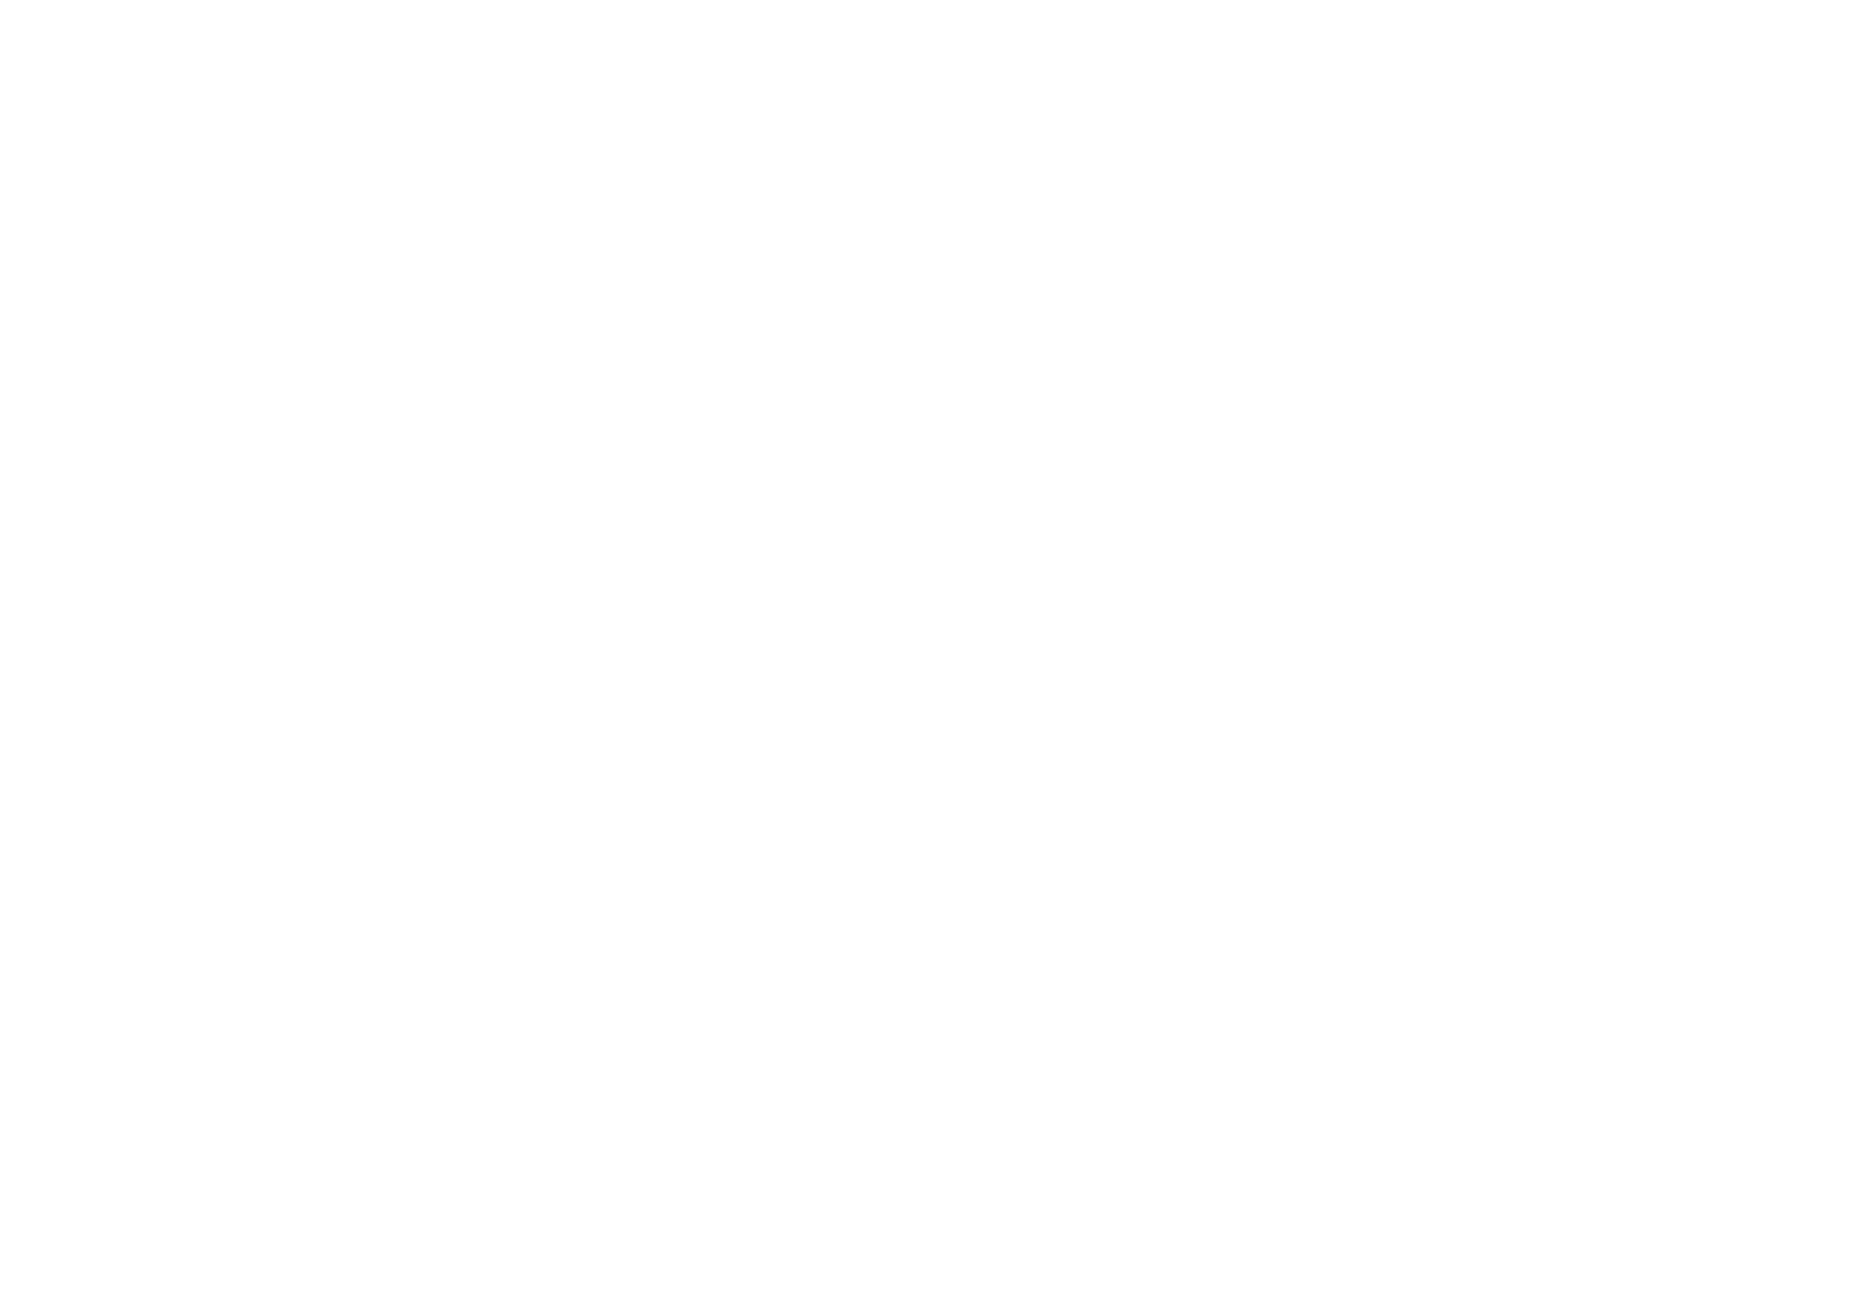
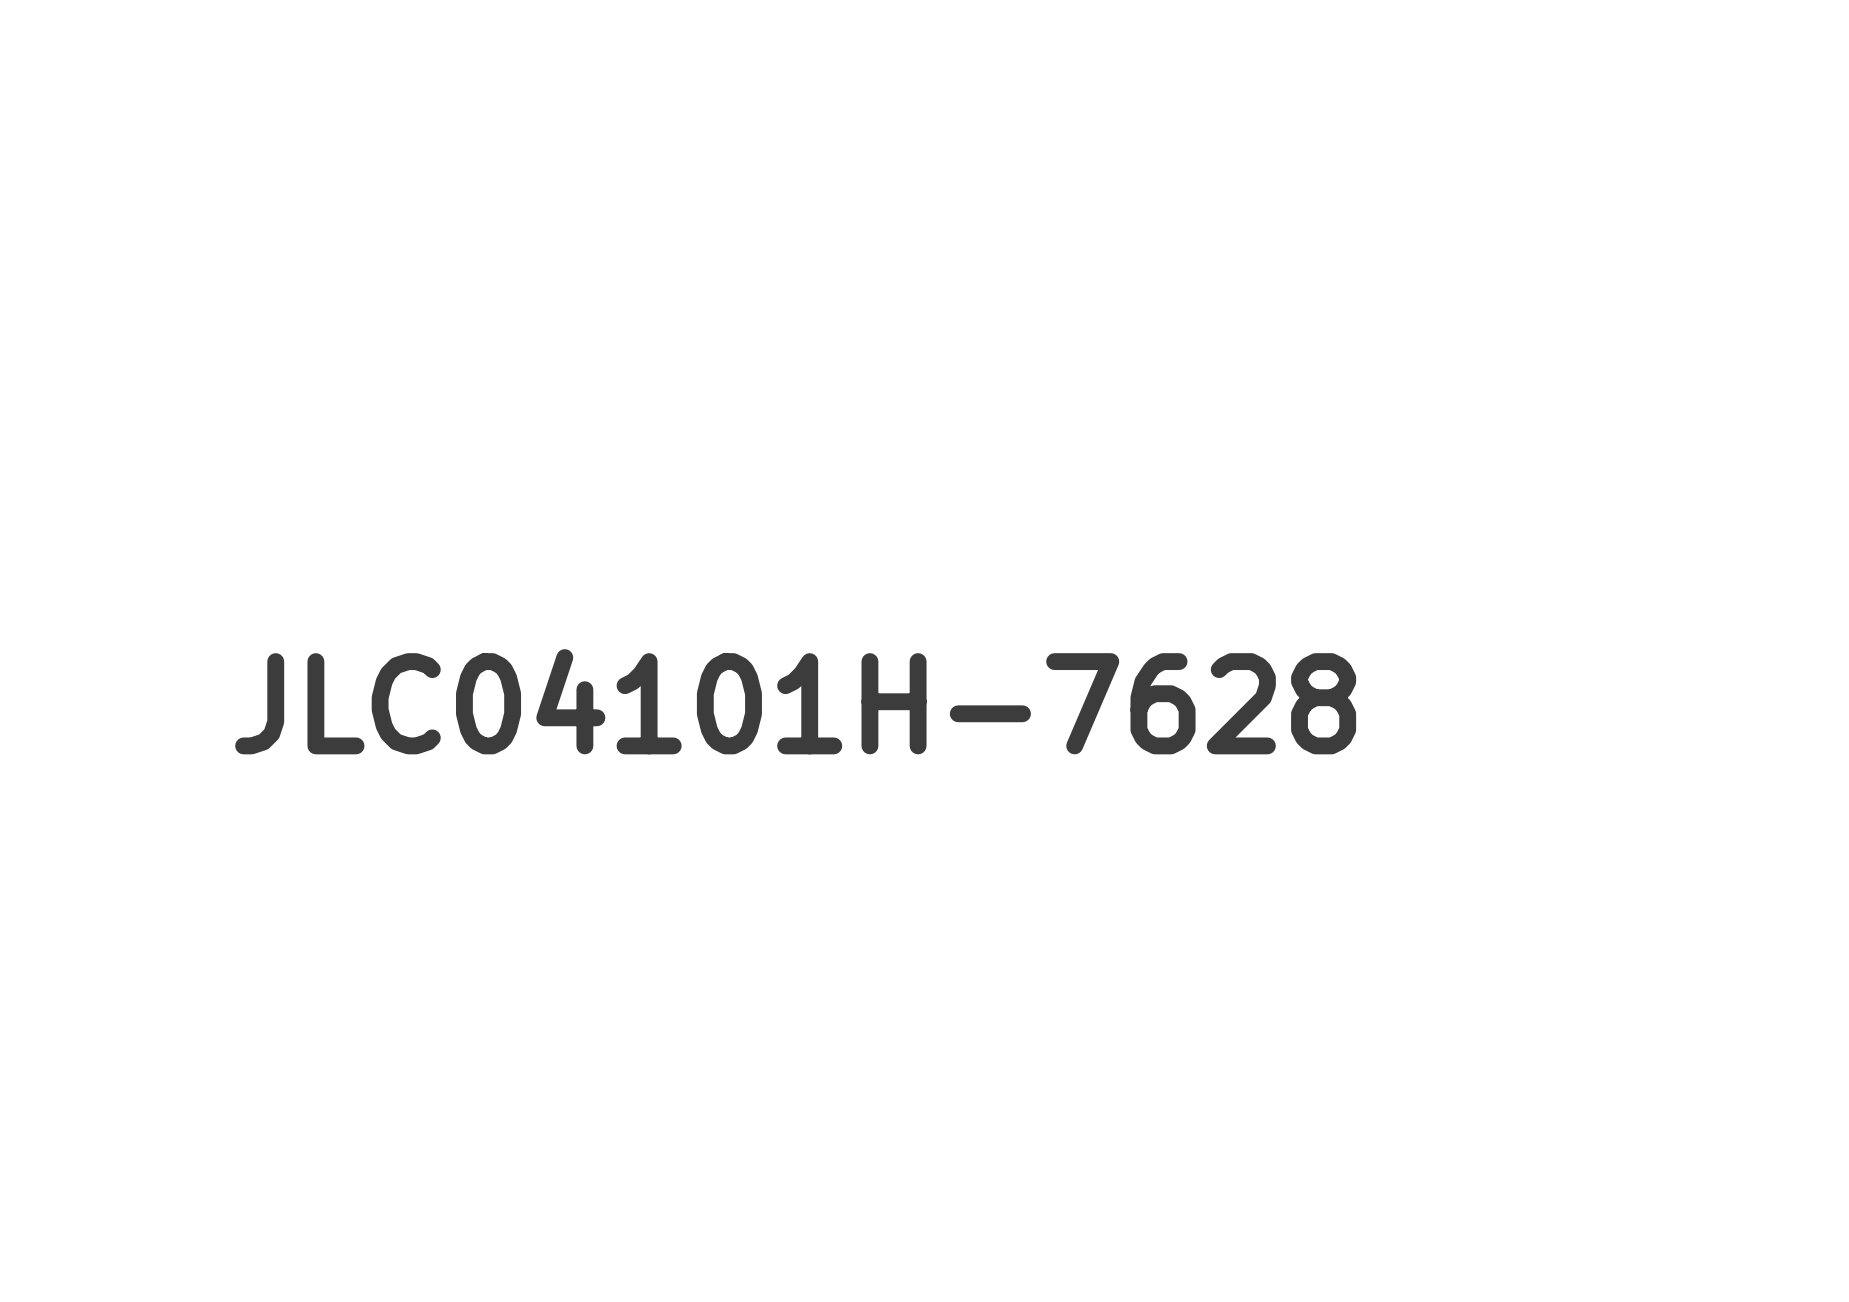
text: none -> JLC04101H-7628 (795, 701)

